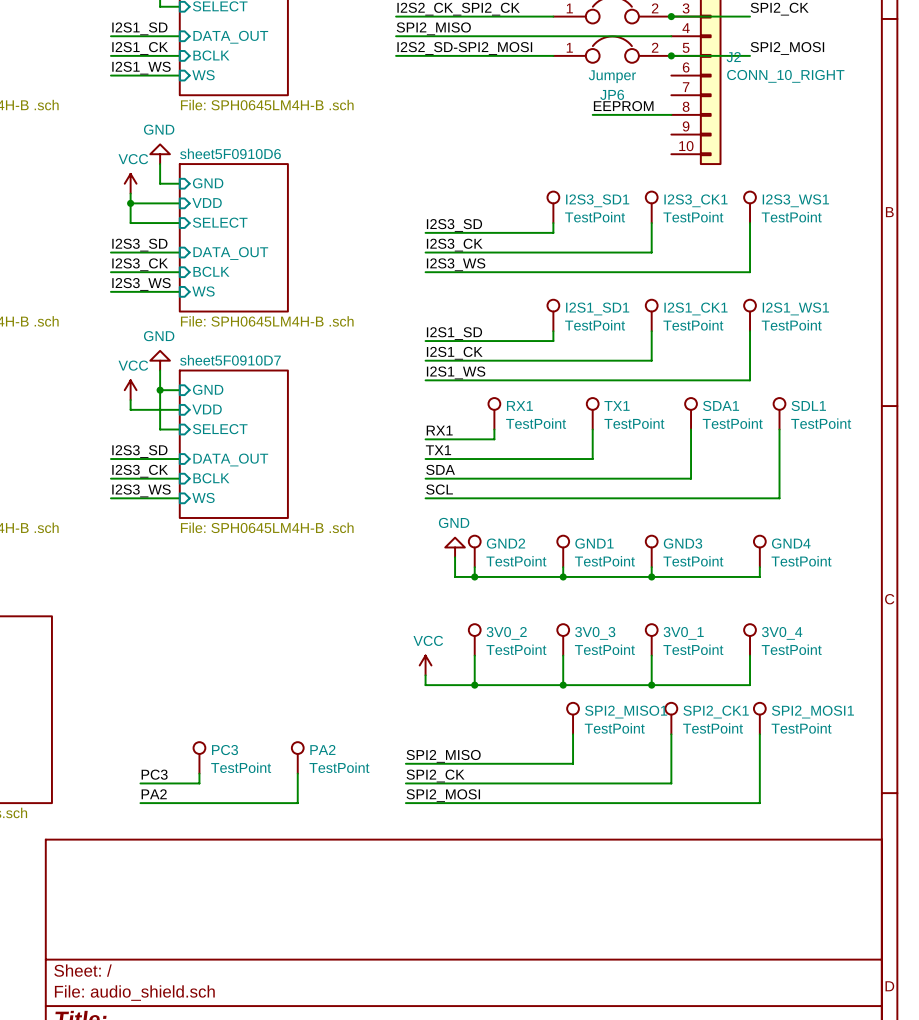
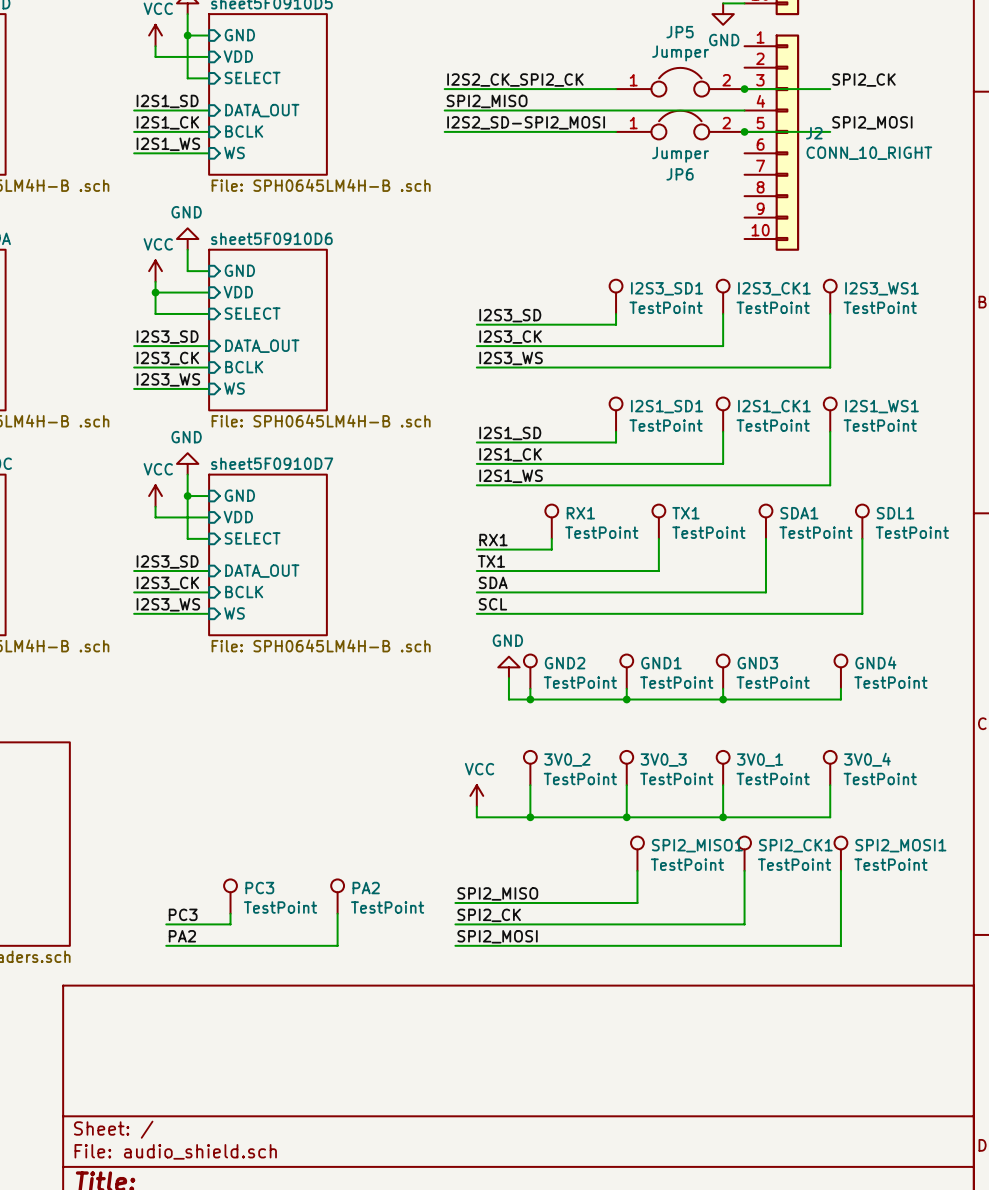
label: EEPROM (623, 106) -> none
wire: (592, 114) (671, 114) -> none

